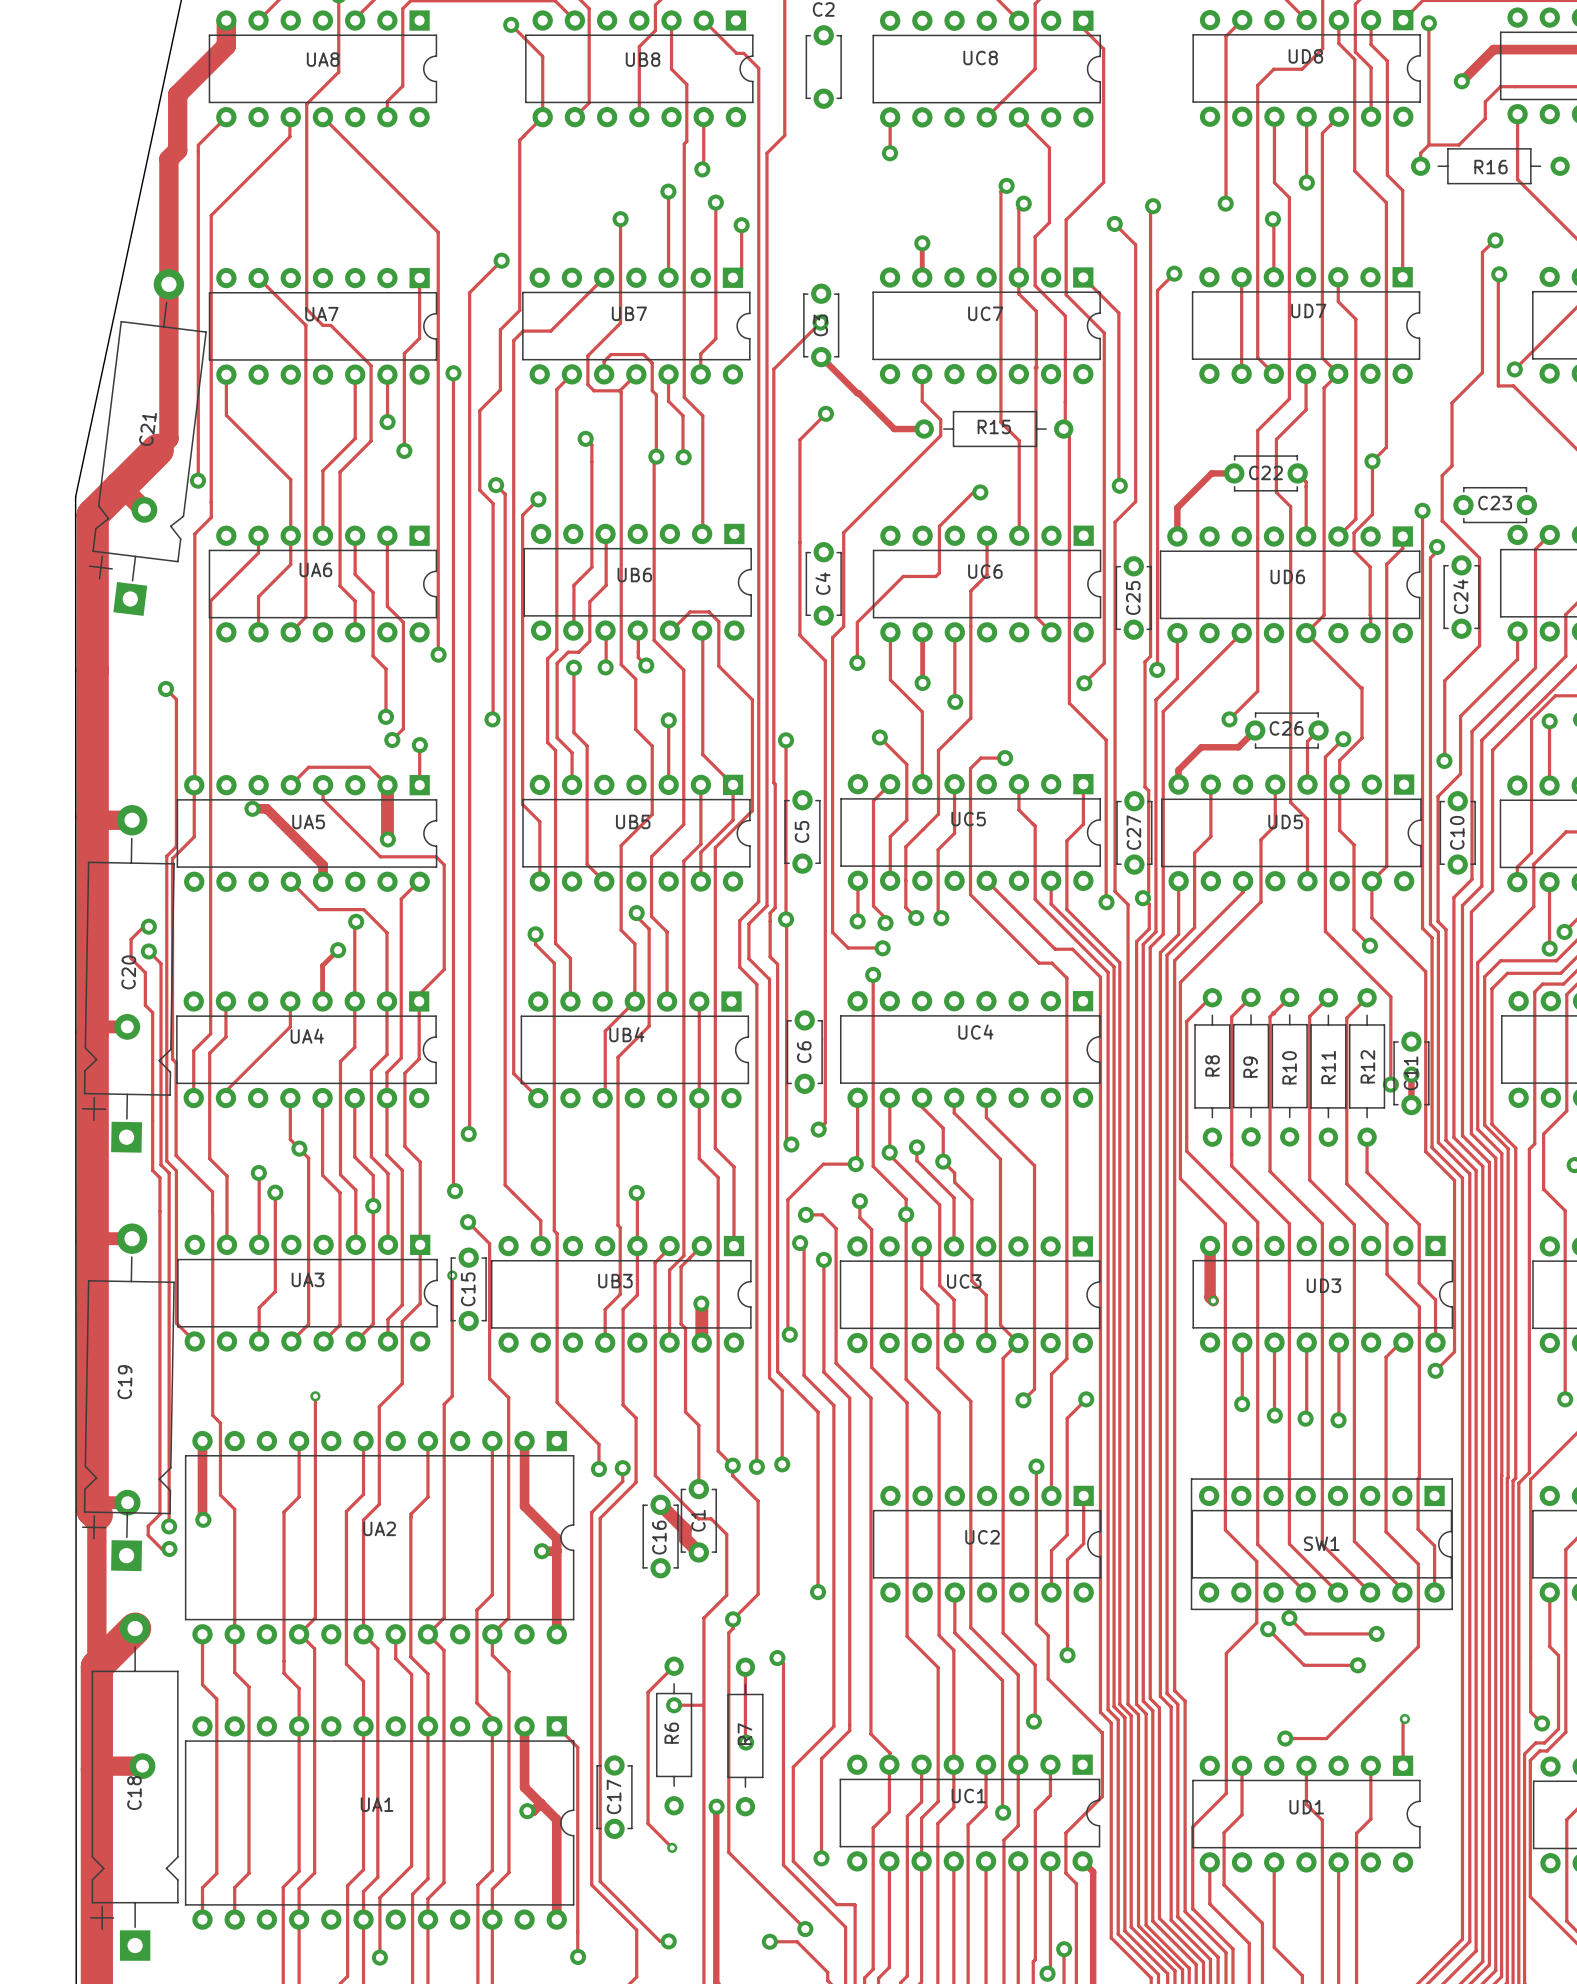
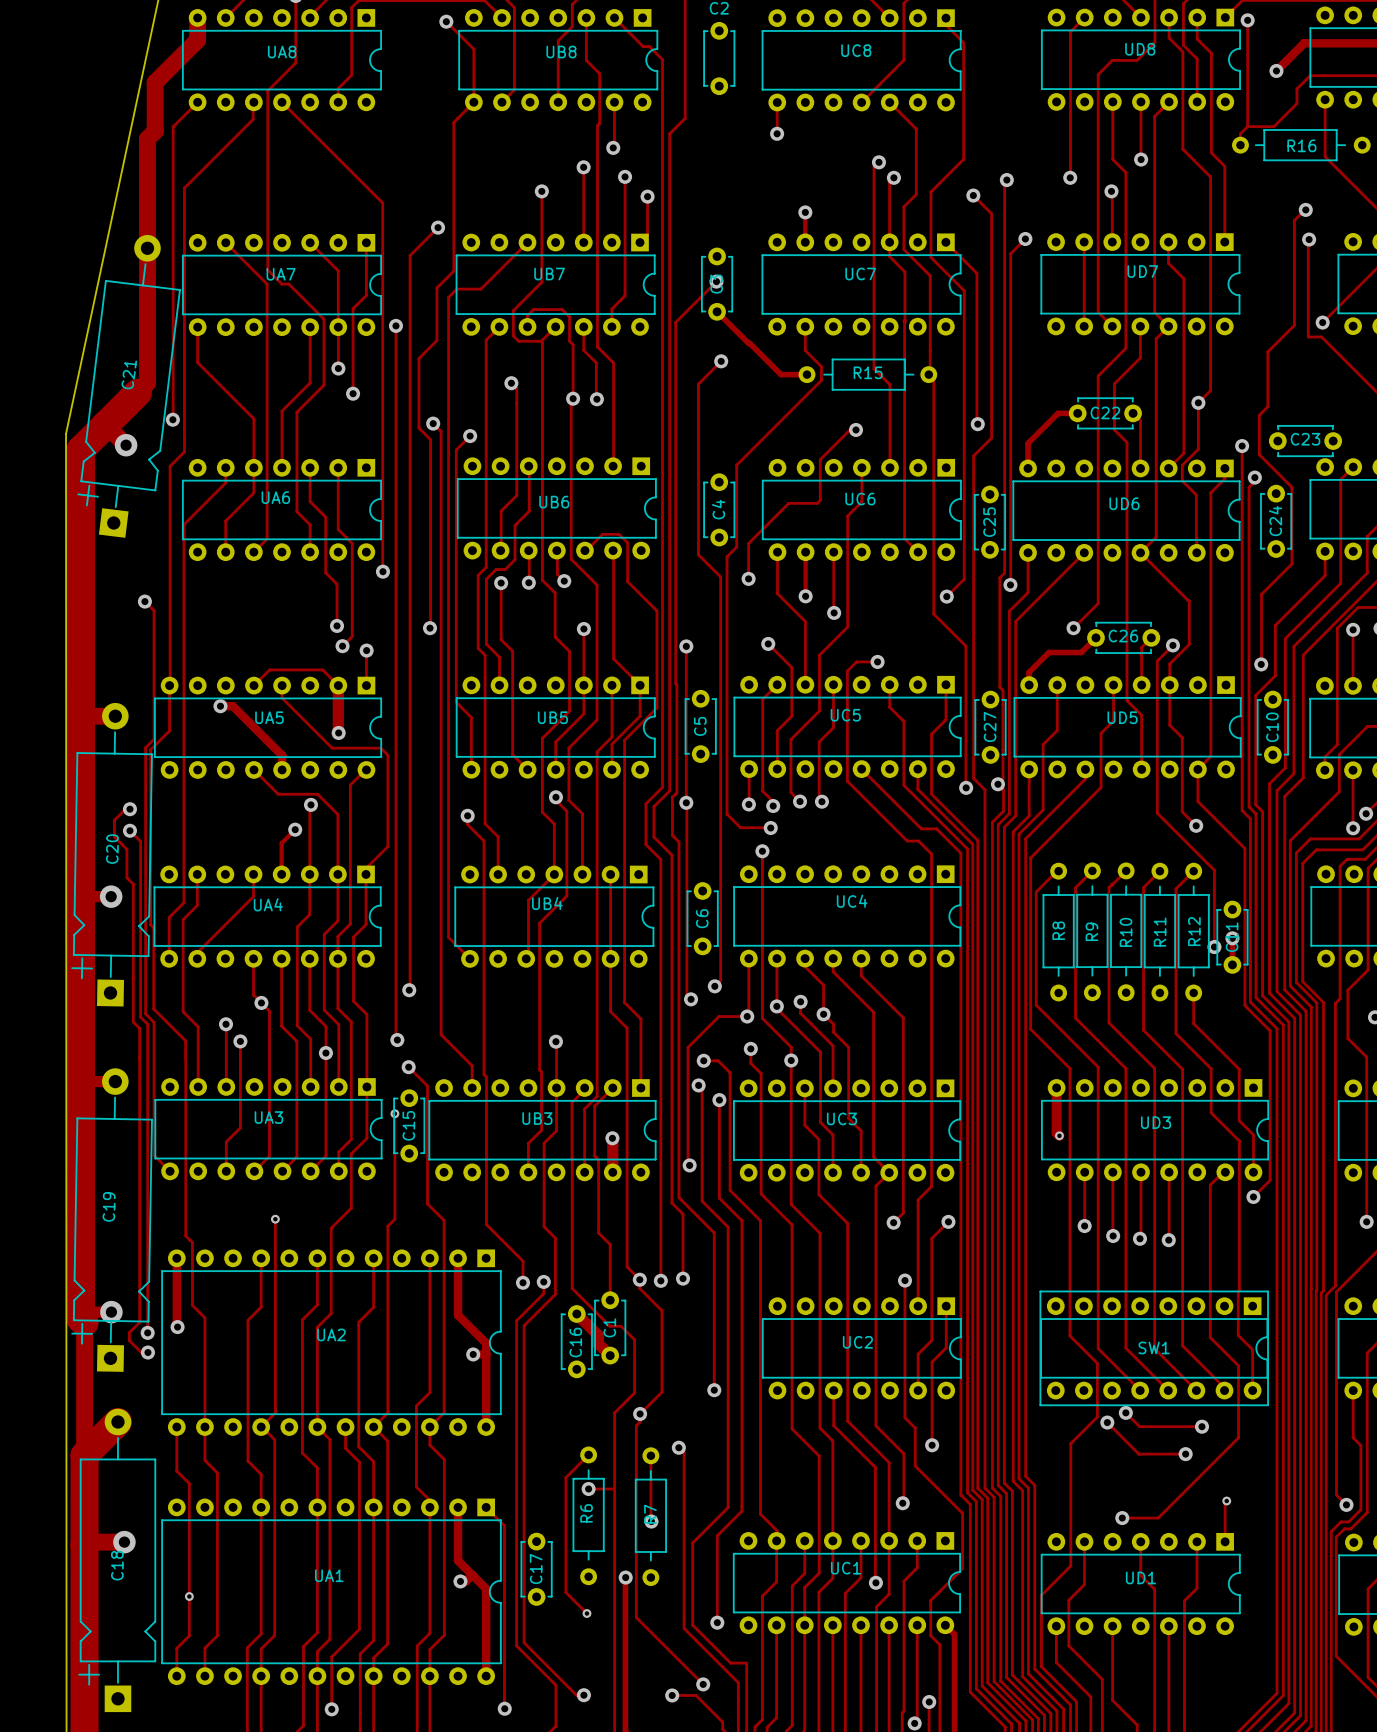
track: none -> (310, 242) (338, 270) (338, 327)
track: none -> (583, 685) (583, 713) (555, 741) (555, 769)
via: none -> (189, 1596)

